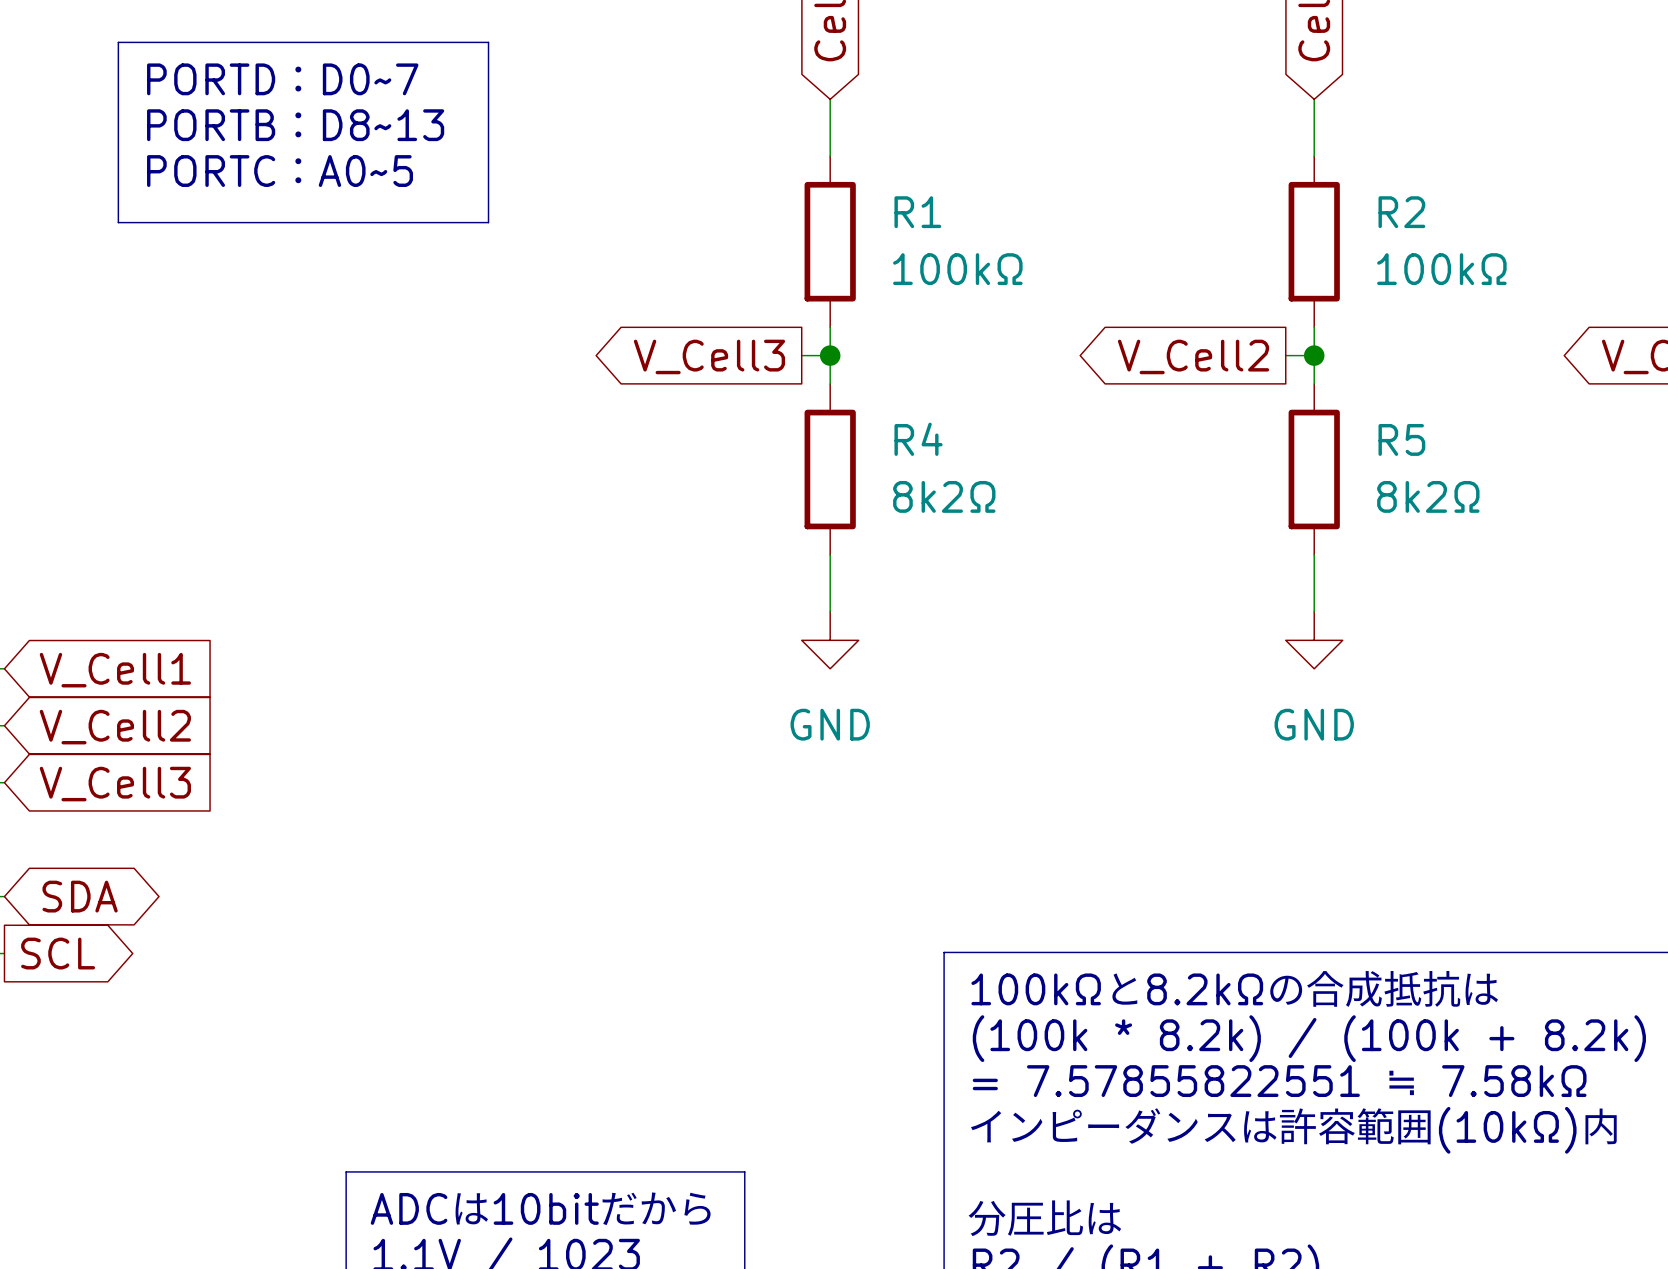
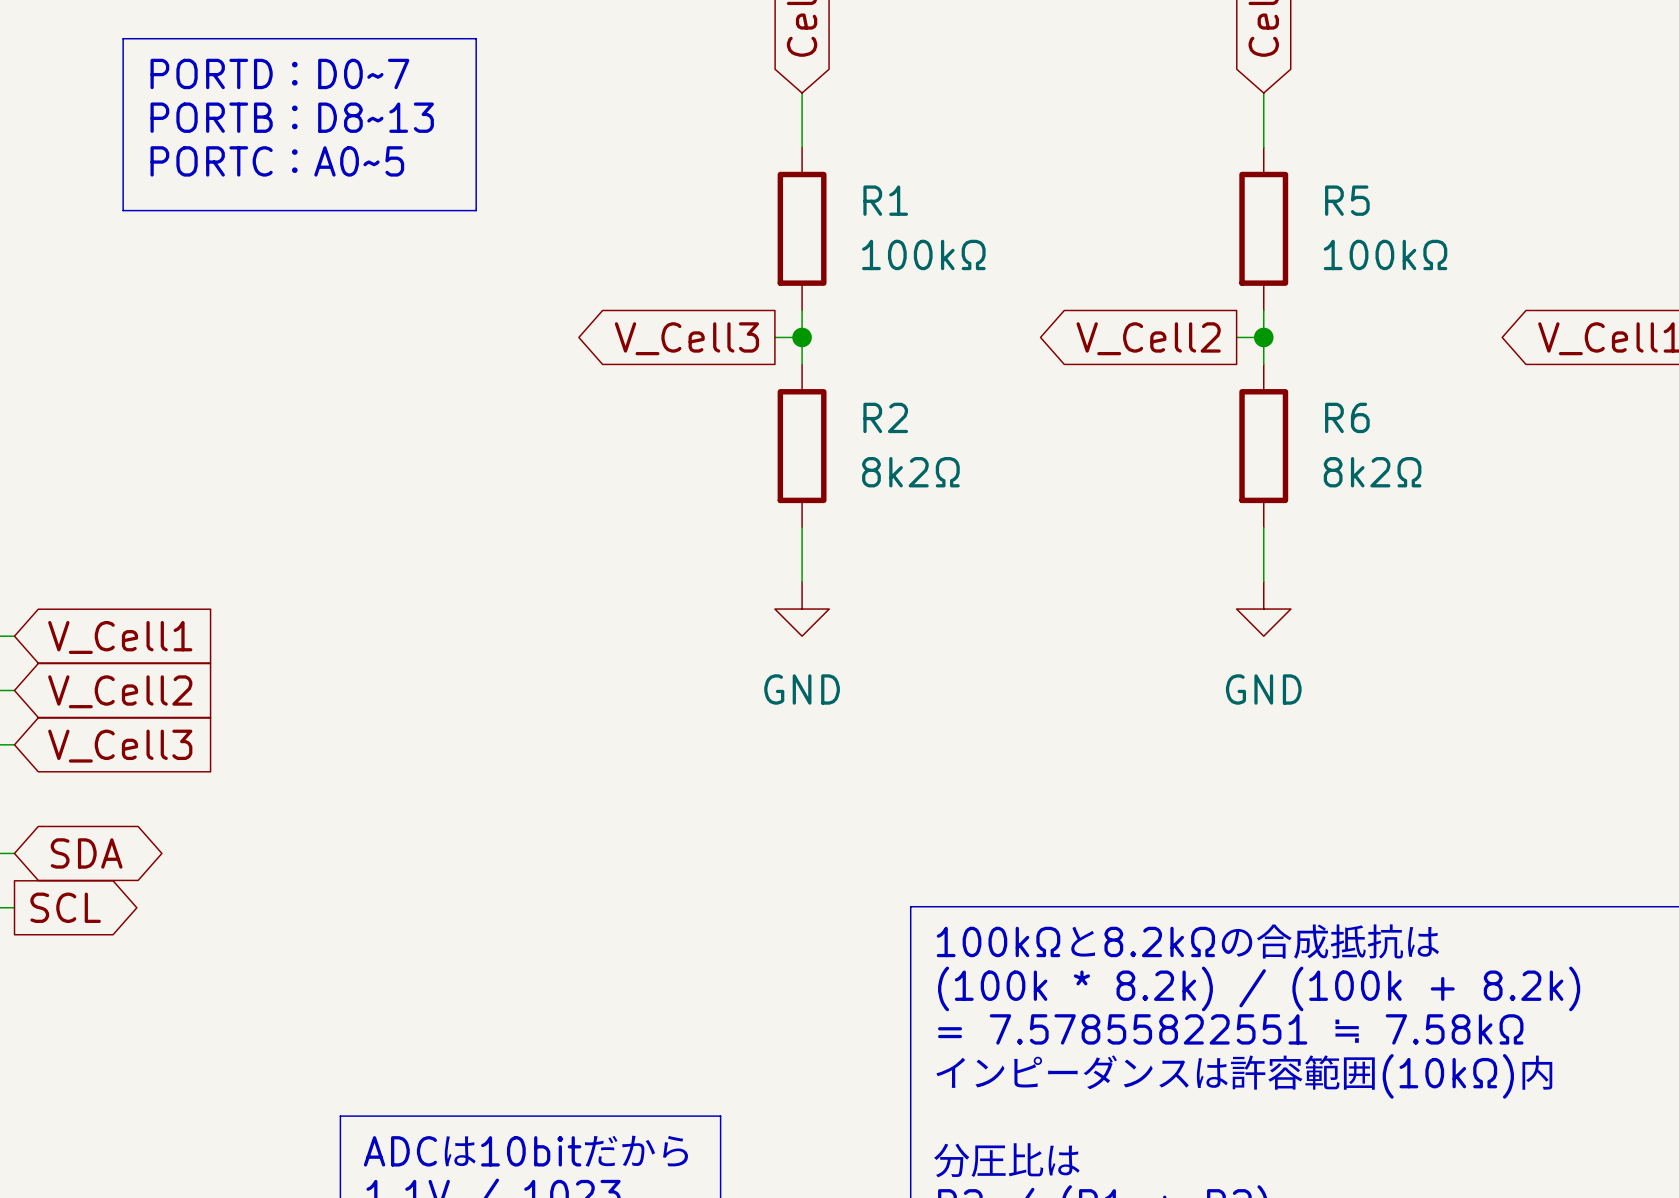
R2 name: R2 (1401, 212) -> R5 (1347, 200)
R4 name: R4 (918, 439) -> R2 (885, 417)
R5 name: R5 (1401, 439) -> R6 (1347, 417)

